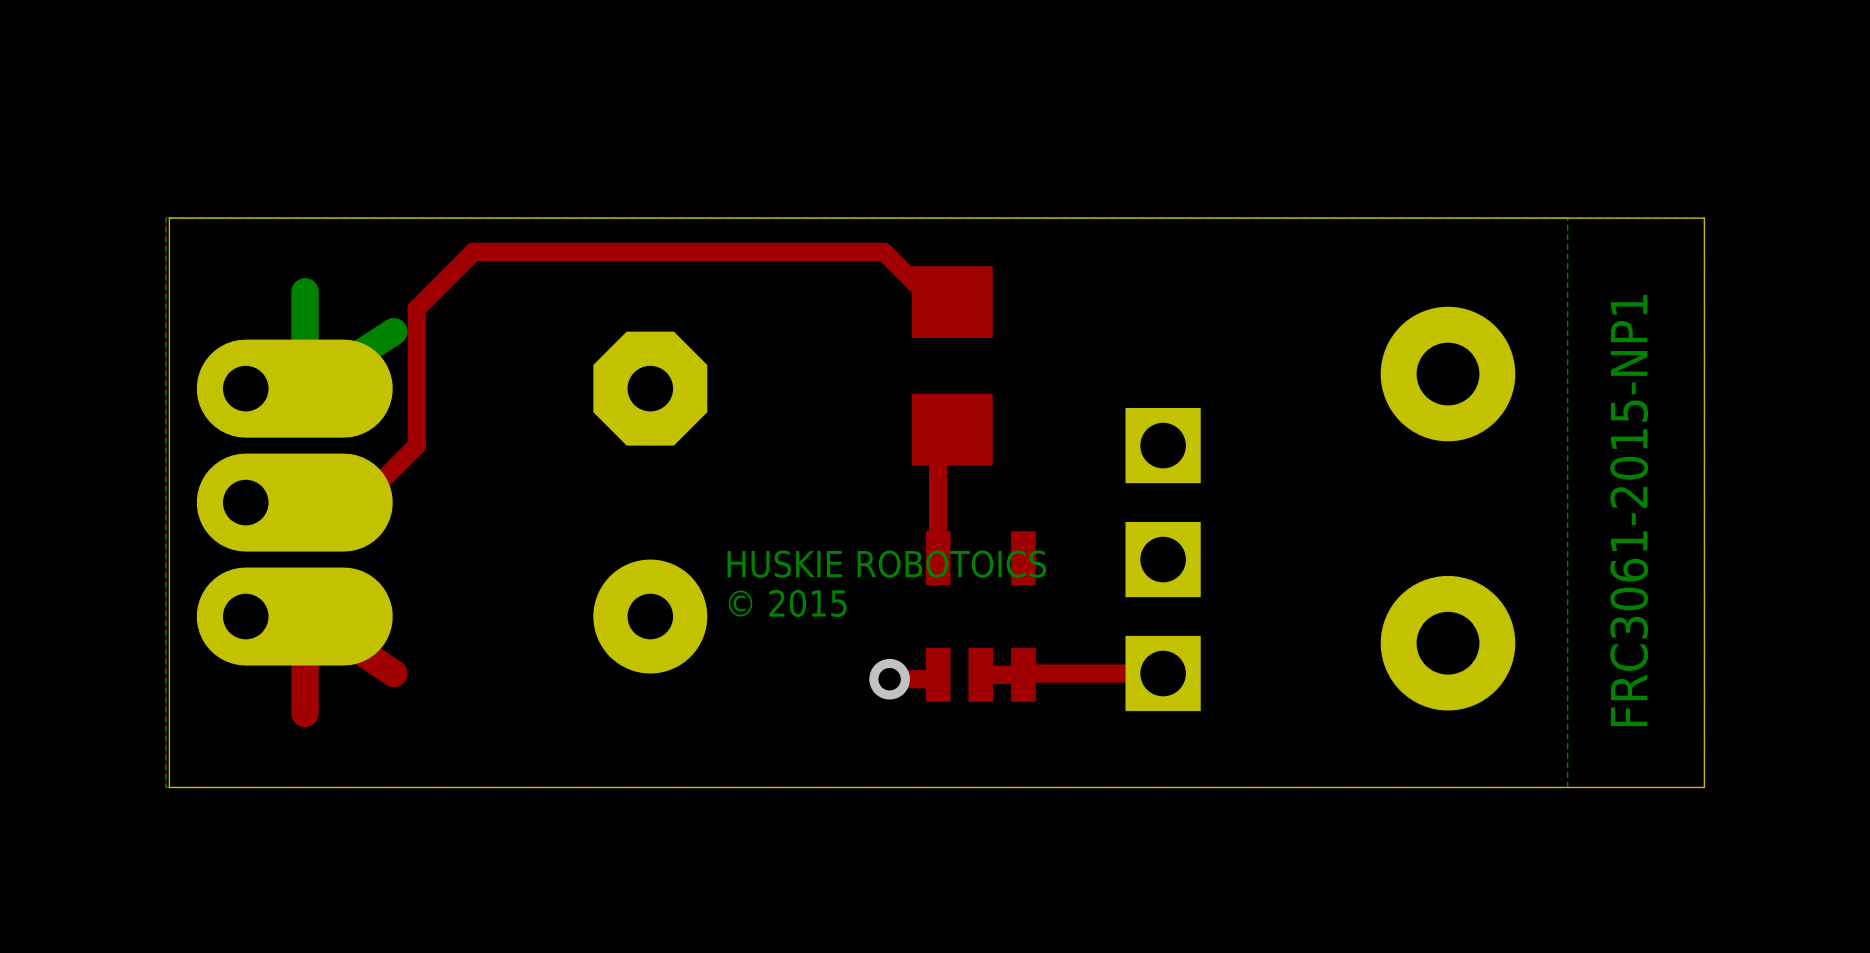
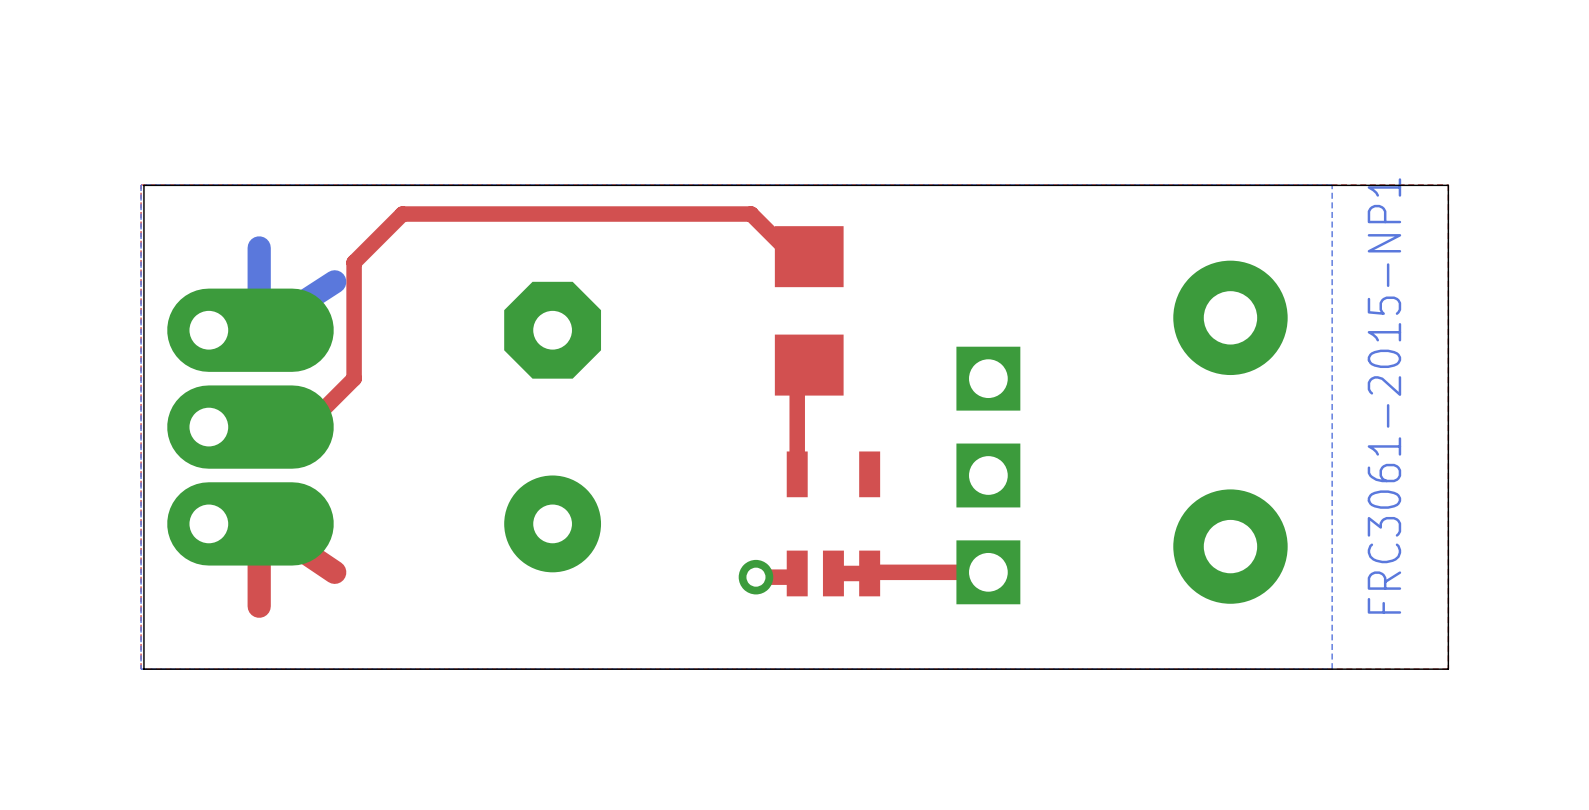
text: HUSKIE ROBOTOICS (886, 564) -> none
text: © 2015 (787, 603) -> none

